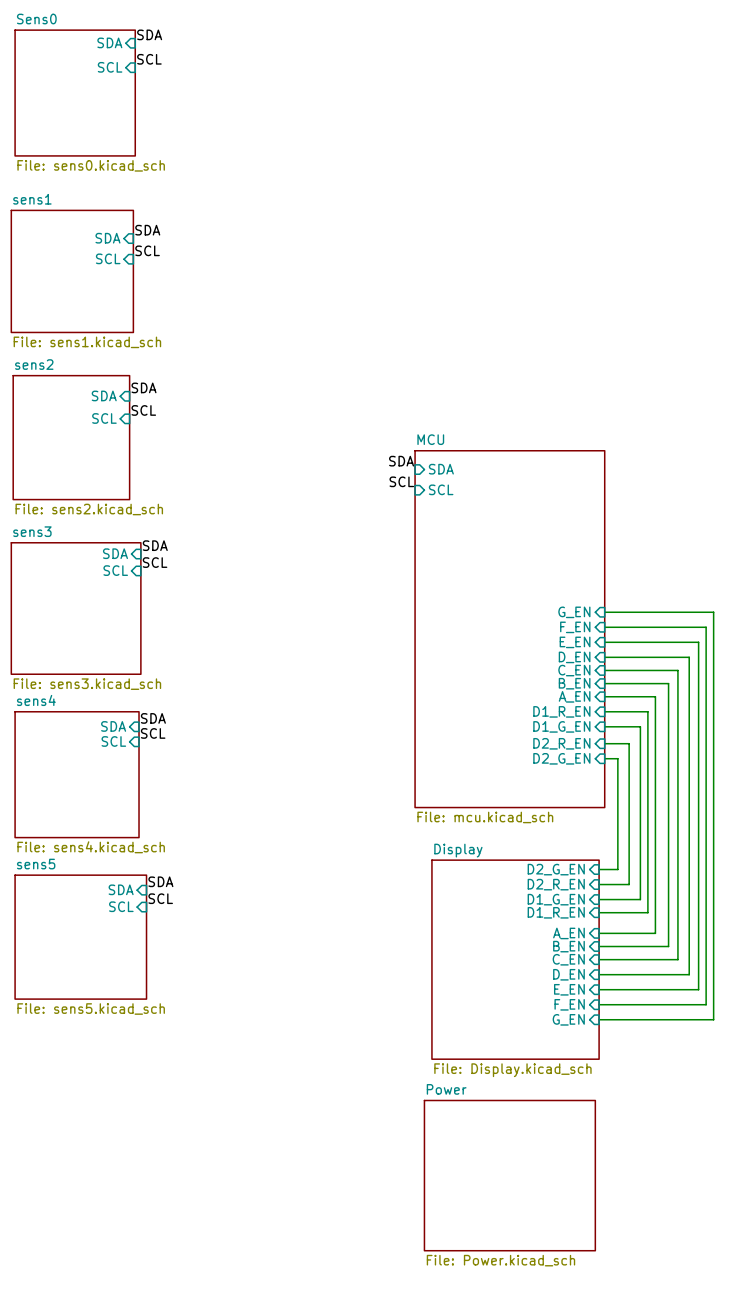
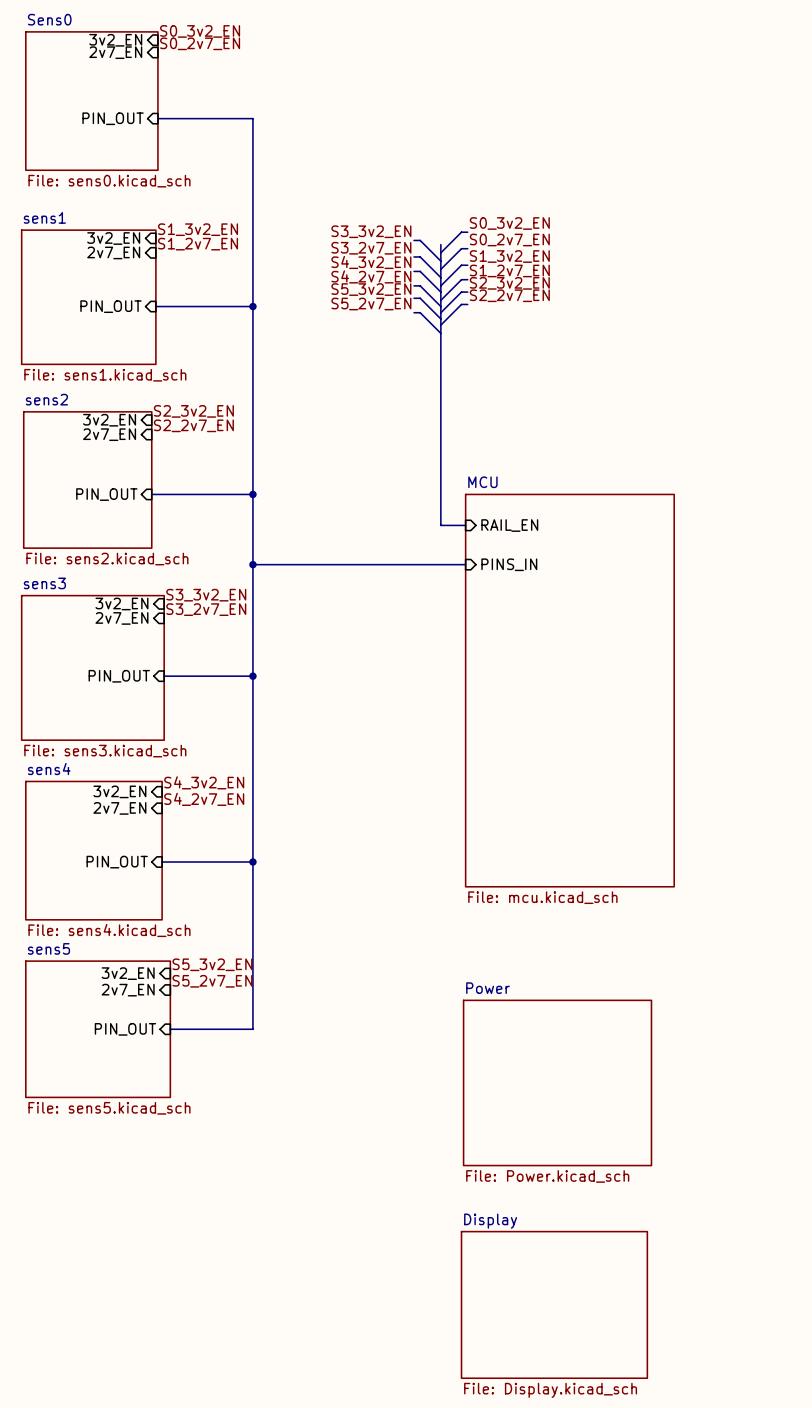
label: none -> S0_3v2_EN (200, 31)
label: SDA (149, 34) -> none
sheet pin: none -> 3v2_EN (115, 40)
label: none -> S0_2v7_EN (200, 43)
sheet pin: SDA (109, 42) -> none
sheet pin: none -> 2v7_EN (115, 52)
label: SCL (149, 59) -> none
sheet pin: SCL (110, 67) -> none
bus: none -> (157, 118) (252, 118) (252, 1029) (170, 1029)
sheet pin: none -> PIN_OUT (113, 118)
label: none -> S0_3v2_EN (509, 223)
label: none -> S1_3v2_EN (198, 229)
label: none -> S3_3v2_EN (371, 231)
wire: none -> (467, 232) (461, 232) (440, 252)
sheet pin: none -> 3v2_EN (113, 238)
wire: none -> (414, 240) (420, 240) (440, 261)
label: none -> S0_2v7_EN (509, 240)
label: none -> S1_2v7_EN (198, 244)
bus: none -> (440, 244) (440, 525) (465, 525)
label: none -> S3_2v7_EN (371, 248)
wire: none -> (467, 248) (461, 248) (440, 269)
label: SDA (147, 230) -> none
sheet pin: none -> 2v7_EN (113, 252)
wire: none -> (414, 256) (420, 256) (440, 277)
label: none -> S1_3v2_EN (509, 256)
sheet pin: SDA (107, 238) -> none
label: none -> S4_3v2_EN (371, 262)
wire: none -> (467, 265) (461, 265) (440, 285)
wire: none -> (414, 271) (420, 271) (440, 292)
label: none -> S1_2v7_EN (509, 270)
label: SCL (147, 250) -> none
label: none -> S4_2v7_EN (371, 276)
wire: none -> (467, 279) (461, 279) (440, 300)
sheet pin: SCL (108, 258) -> none
label: none -> S2_3v2_EN (509, 283)
wire: none -> (414, 285) (420, 285) (440, 306)
label: none -> S5_3v2_EN (371, 289)
wire: none -> (467, 292) (461, 292) (440, 312)
label: none -> S2_2v7_EN (509, 295)
wire: none -> (414, 298) (420, 298) (440, 318)
label: none -> S5_2v7_EN (371, 304)
wire: none -> (467, 304) (461, 304) (440, 325)
sheet pin: none -> PIN_OUT (110, 306)
bus: none -> (155, 306) (252, 306)
junction: none -> (252, 306)
wire: none -> (414, 312) (420, 312) (440, 333)
label: none -> S2_3v2_EN (193, 411)
sheet pin: none -> 3v2_EN (109, 420)
label: SDA (144, 387) -> S2_2v7_EN (193, 425)
sheet pin: SDA (104, 395) -> 2v7_EN (109, 434)
label: SCL (143, 410) -> none
sheet pin: SCL (104, 418) -> none
sheet pin: none -> PIN_OUT (106, 494)
bus: none -> (151, 494) (252, 494)
junction: none -> (252, 494)
label: SDA (401, 461) -> none
sheet pin: SDA (441, 469) -> none
sheet pin: none -> RAIL_EN (509, 525)
label: SCL (401, 481) -> none
sheet pin: SCL (441, 489) -> none
bus: none -> (252, 564) (465, 564)
junction: none -> (252, 564)
sheet pin: none -> PINS_IN (509, 564)
label: SDA (155, 545) -> S3_3v2_EN (206, 595)
sheet pin: SDA (115, 553) -> 3v2_EN (121, 603)
label: none -> S3_2v7_EN (206, 609)
label: SCL (155, 562) -> none
sheet pin: none -> 2v7_EN (121, 618)
sheet pin: SCL (115, 570) -> none
sheet pin: G_EN (574, 612) -> none
wire: (604, 612) (713, 612) (713, 1019) (599, 1019) -> none
sheet pin: none -> PIN_OUT (119, 676)
bus: none -> (164, 676) (252, 676)
junction: none -> (252, 676)
sheet pin: F_EN (575, 627) -> none
wire: (604, 627) (706, 627) (706, 1004) (599, 1004) -> none
sheet pin: E_EN (575, 642) -> none
wire: (604, 642) (698, 642) (698, 989) (599, 989) -> none
sheet pin: D_EN (574, 657) -> none
wire: (604, 657) (689, 657) (689, 974) (599, 974) -> none
sheet pin: C_EN (574, 670) -> none
wire: (604, 670) (677, 670) (677, 959) (599, 959) -> none
sheet pin: B_EN (574, 683) -> none
wire: (604, 683) (668, 683) (668, 946) (599, 946) -> none
sheet pin: A_EN (574, 696) -> none
wire: (604, 696) (655, 696) (655, 933) (599, 933) -> none
sheet pin: D1_R_EN (561, 711) -> none
wire: (604, 711) (647, 711) (647, 912) (599, 912) -> none
label: none -> S4_3v2_EN (204, 782)
label: SDA (153, 718) -> none
sheet pin: none -> 3v2_EN (119, 791)
sheet pin: SDA (113, 726) -> none
sheet pin: D1_G_EN (561, 726) -> none
wire: (604, 726) (640, 726) (640, 899) (599, 899) -> none
label: none -> S4_2v7_EN (204, 799)
label: SCL (153, 733) -> none
sheet pin: none -> 2v7_EN (119, 808)
sheet pin: SCL (113, 741) -> none
sheet pin: D2_R_EN (561, 743) -> none
wire: (604, 743) (629, 743) (629, 884) (599, 884) -> none
sheet pin: D2_G_EN (561, 758) -> none
wire: (604, 758) (617, 758) (617, 869) (599, 869) -> none
sheet pin: none -> PIN_OUT (117, 862)
bus: none -> (162, 862) (252, 862)
junction: none -> (252, 862)
sheet pin: D2_G_EN (556, 869) -> none
label: SDA (160, 881) -> S5_3v2_EN (212, 964)
sheet pin: D2_R_EN (556, 884) -> none
sheet pin: SDA (121, 889) -> 3v2_EN (128, 973)
label: none -> S5_2v7_EN (212, 981)
label: SCL (160, 898) -> none
sheet pin: D1_G_EN (556, 899) -> none
sheet pin: none -> 2v7_EN (128, 990)
sheet pin: SCL (121, 906) -> none
sheet pin: D1_R_EN (556, 912) -> none
sheet pin: A_EN (568, 933) -> none
sheet pin: none -> PIN_OUT (125, 1029)
sheet pin: B_EN (568, 946) -> none
sheet Display: File: Display.kicad_sch (515, 959) -> none
sheet pin: C_EN (568, 959) -> none
sheet pin: D_EN (568, 974) -> none
sheet Power: none -> File: Power.kicad_sch (557, 1082)
sheet pin: E_EN (569, 989) -> none
sheet pin: F_EN (569, 1004) -> none
sheet pin: G_EN (568, 1019) -> none
sheet Power: File: Power.kicad_sch (509, 1175) -> none
sheet Display: none -> File: Display.kicad_sch (554, 1304)

